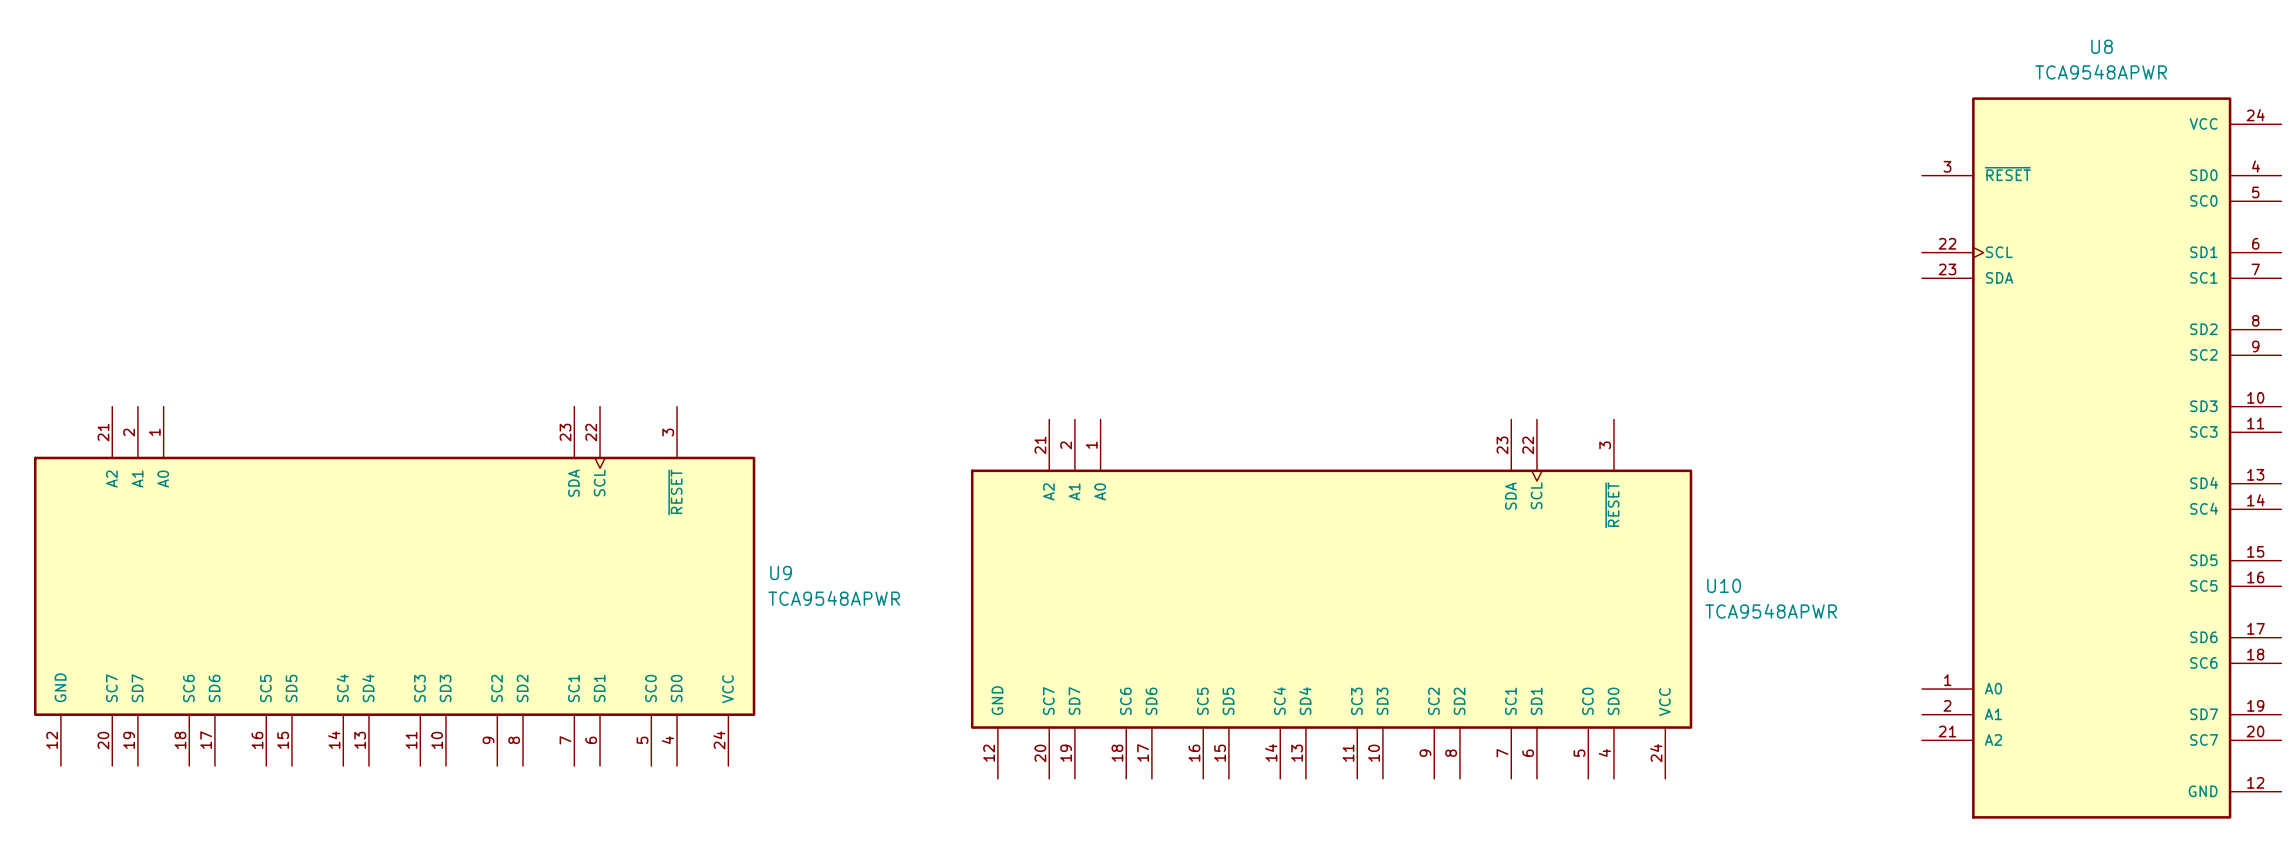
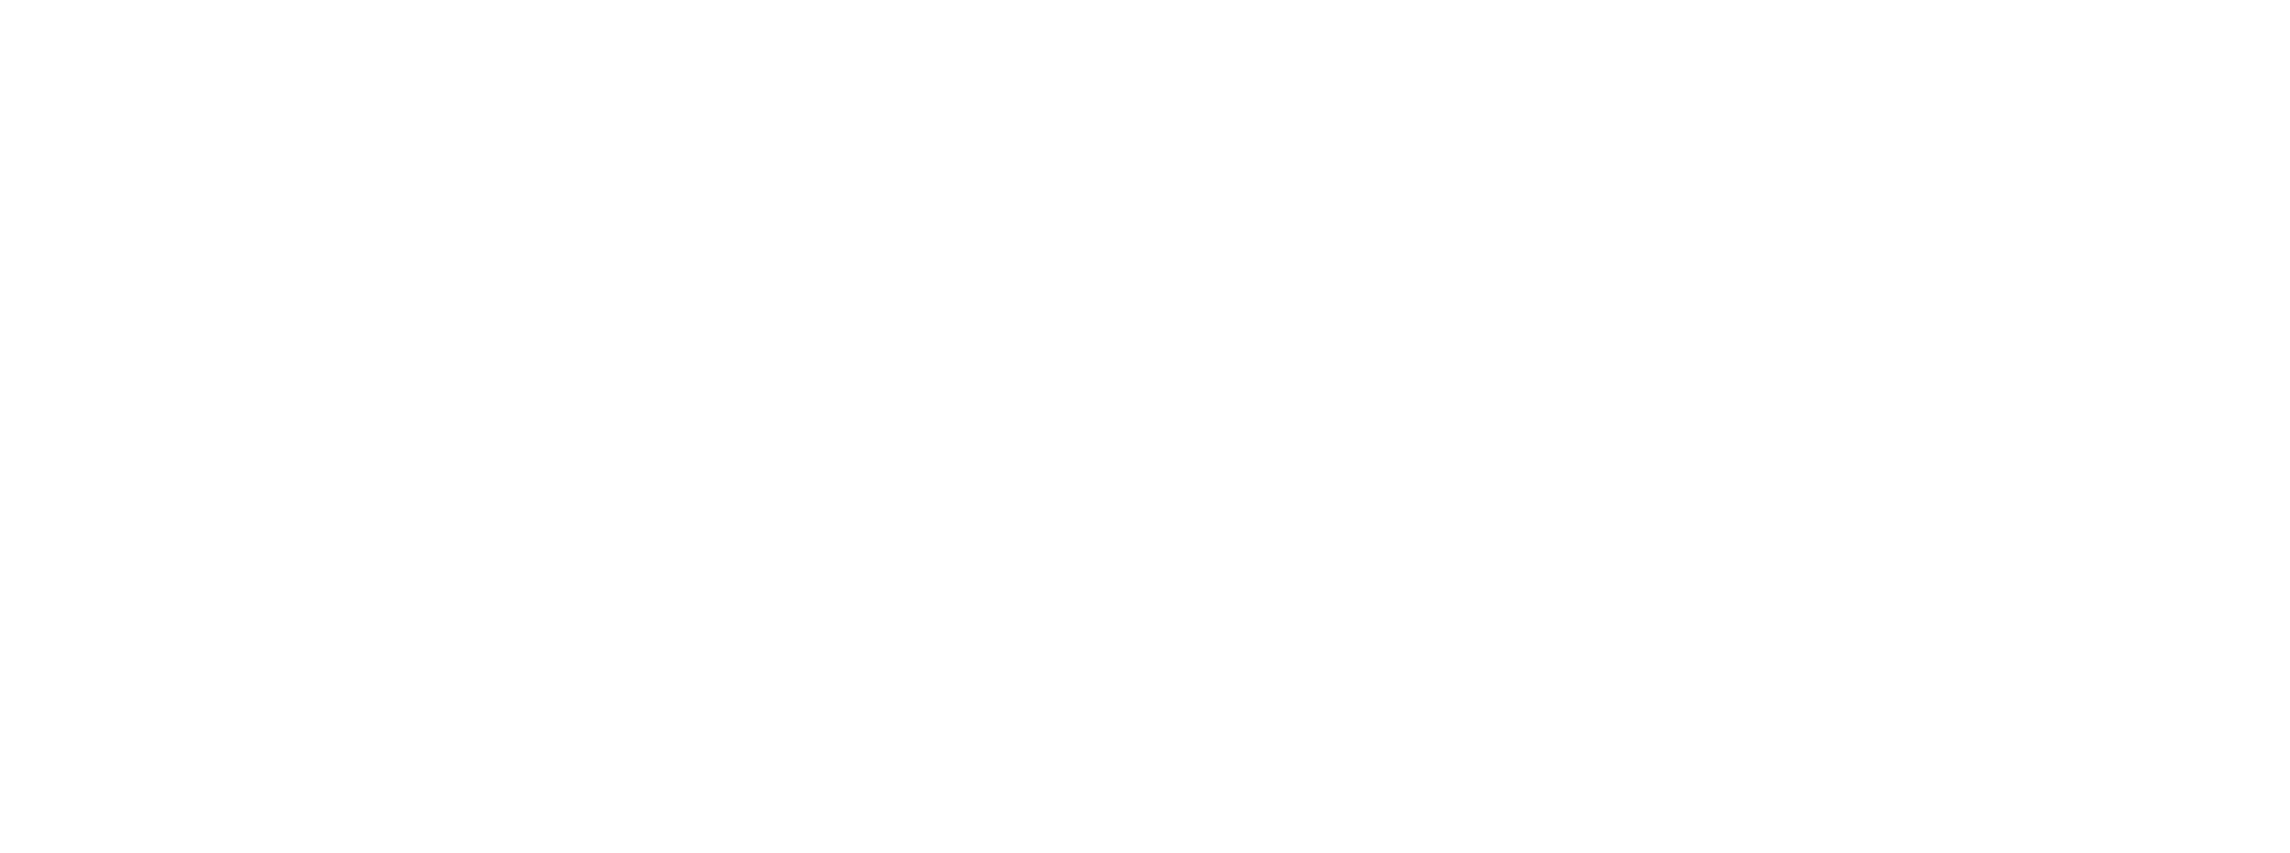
U8: TCA9548APWR (2101, 457) -> none
U9: TCA9548APWR (394, 586) -> none
U10: TCA9548APWR (1331, 599) -> none

